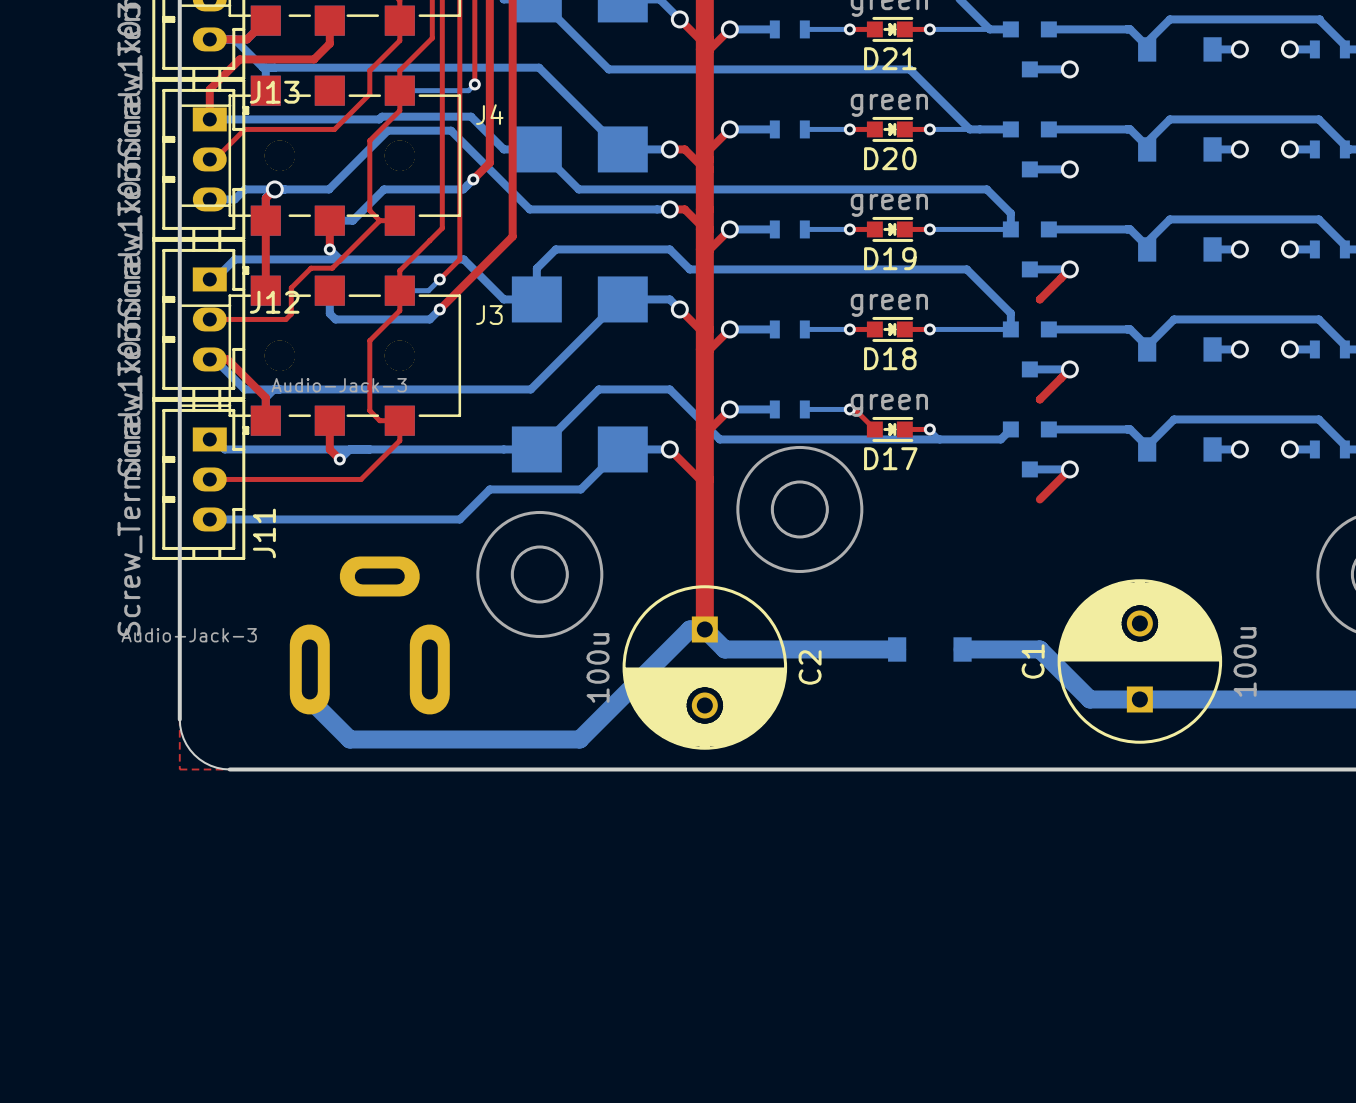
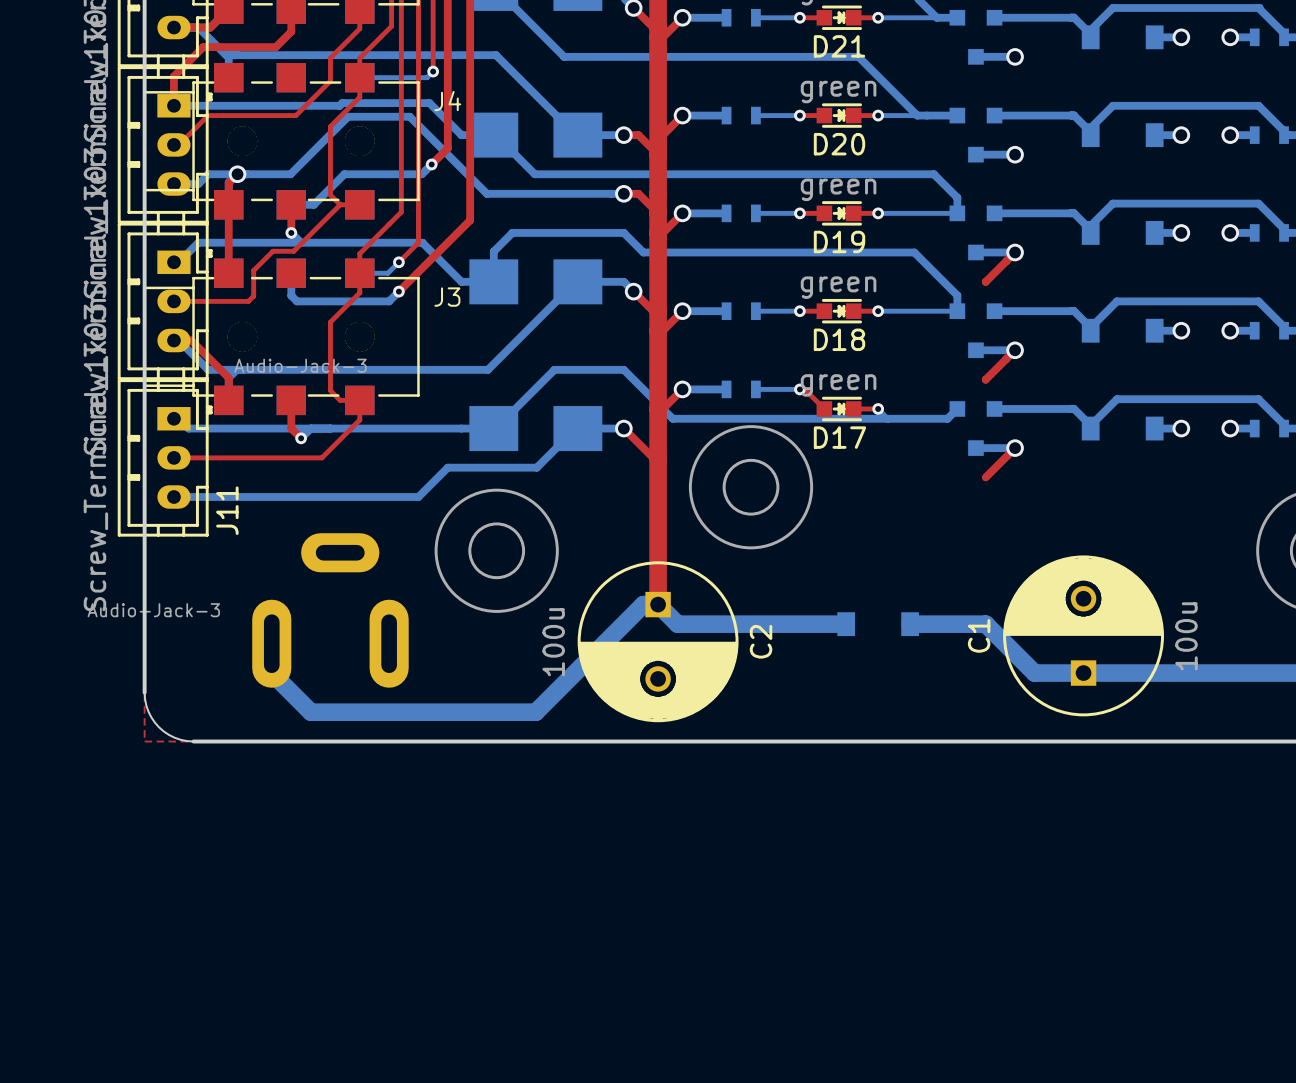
J13 name: J13 (274, 92) -> none
J12 name: J12 (274, 302) -> none

